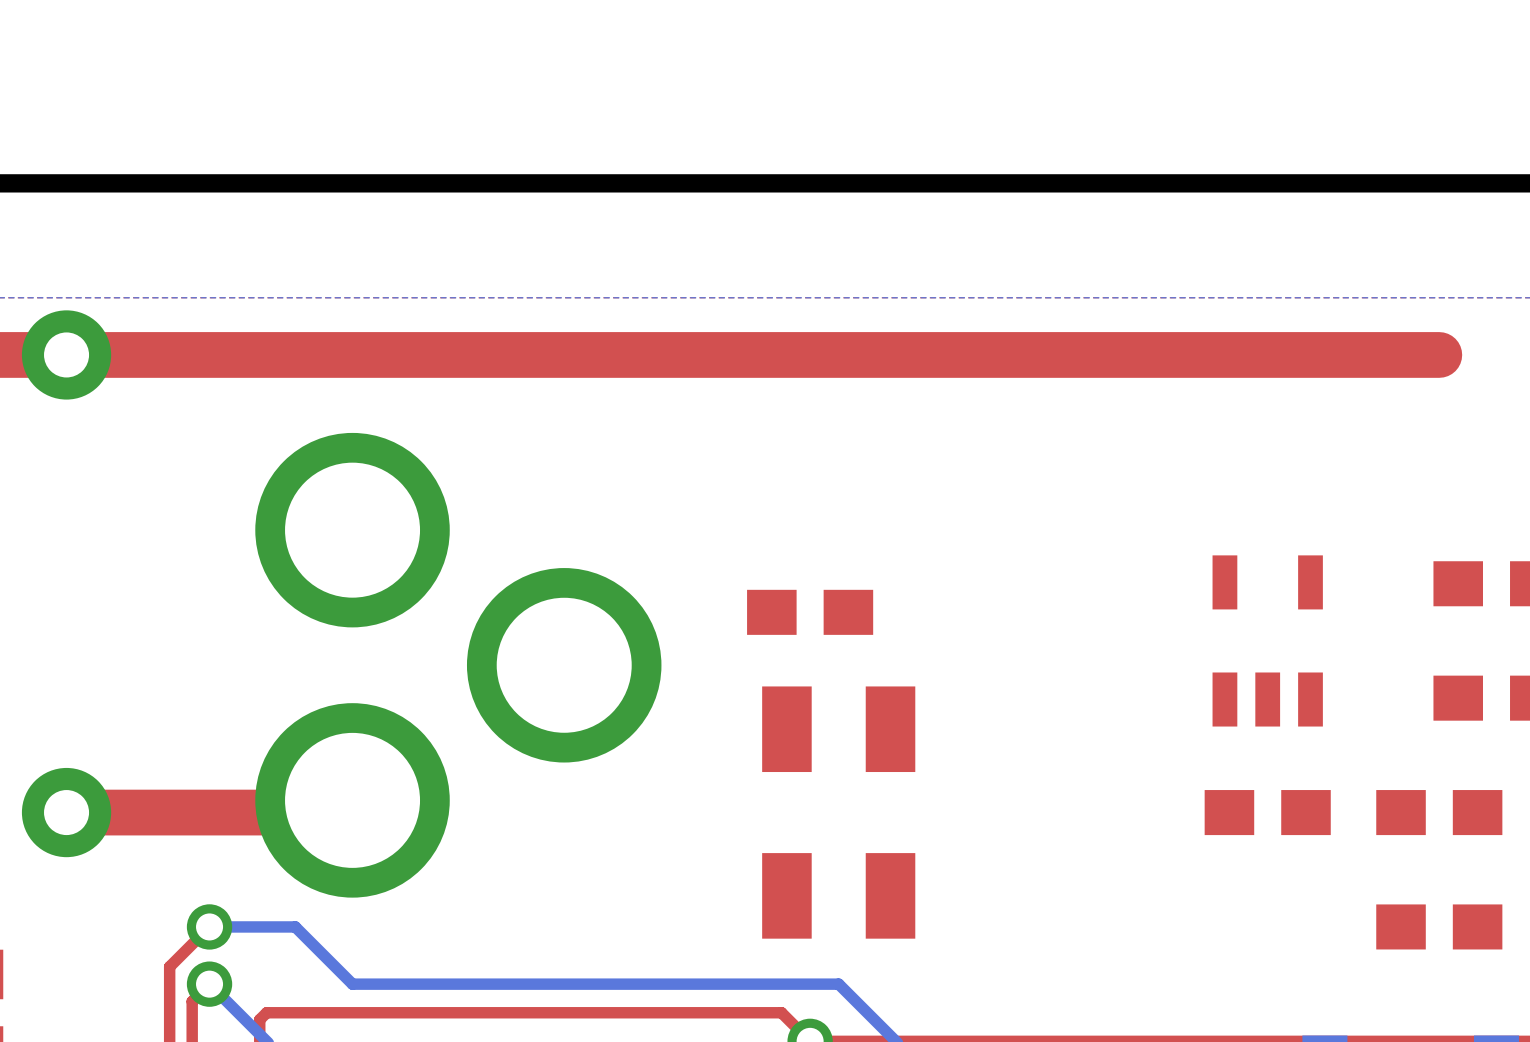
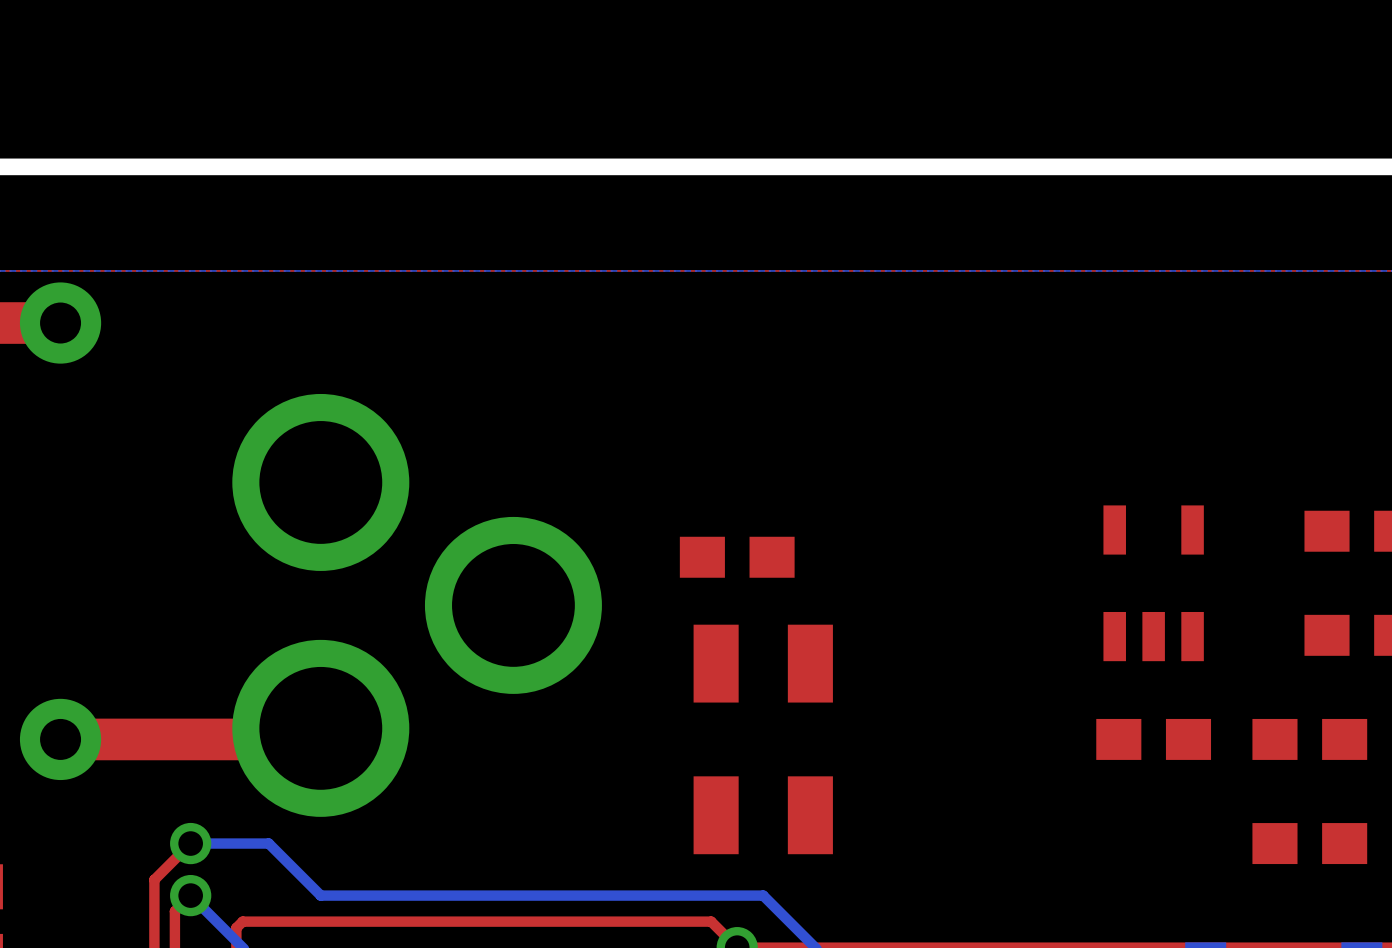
top track: (1439, 354) (66, 354) -> none

